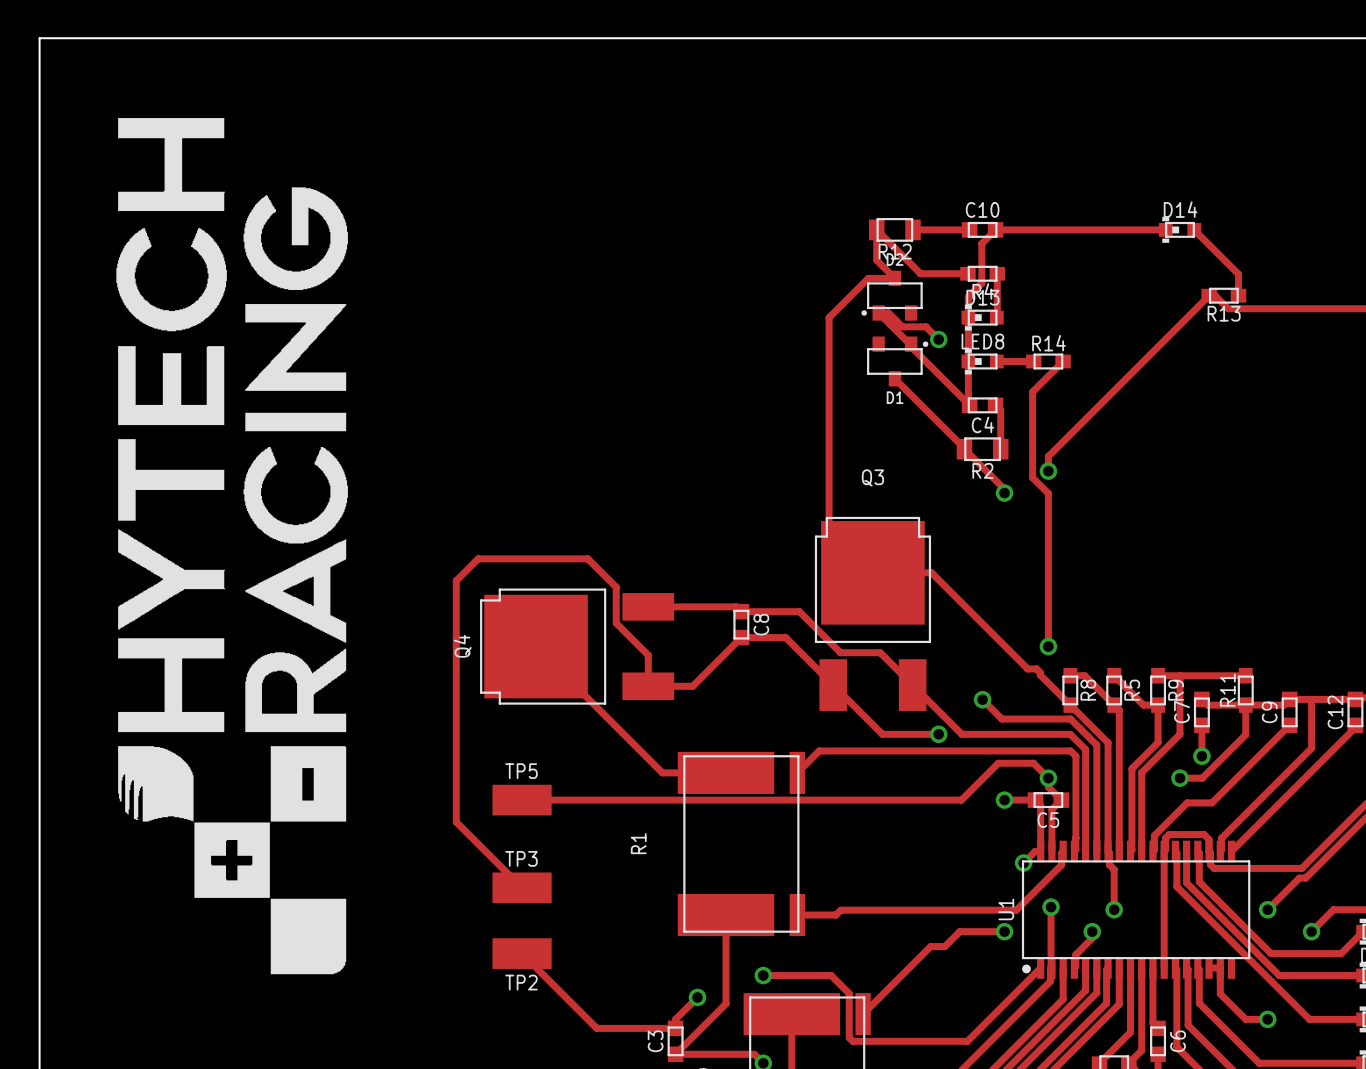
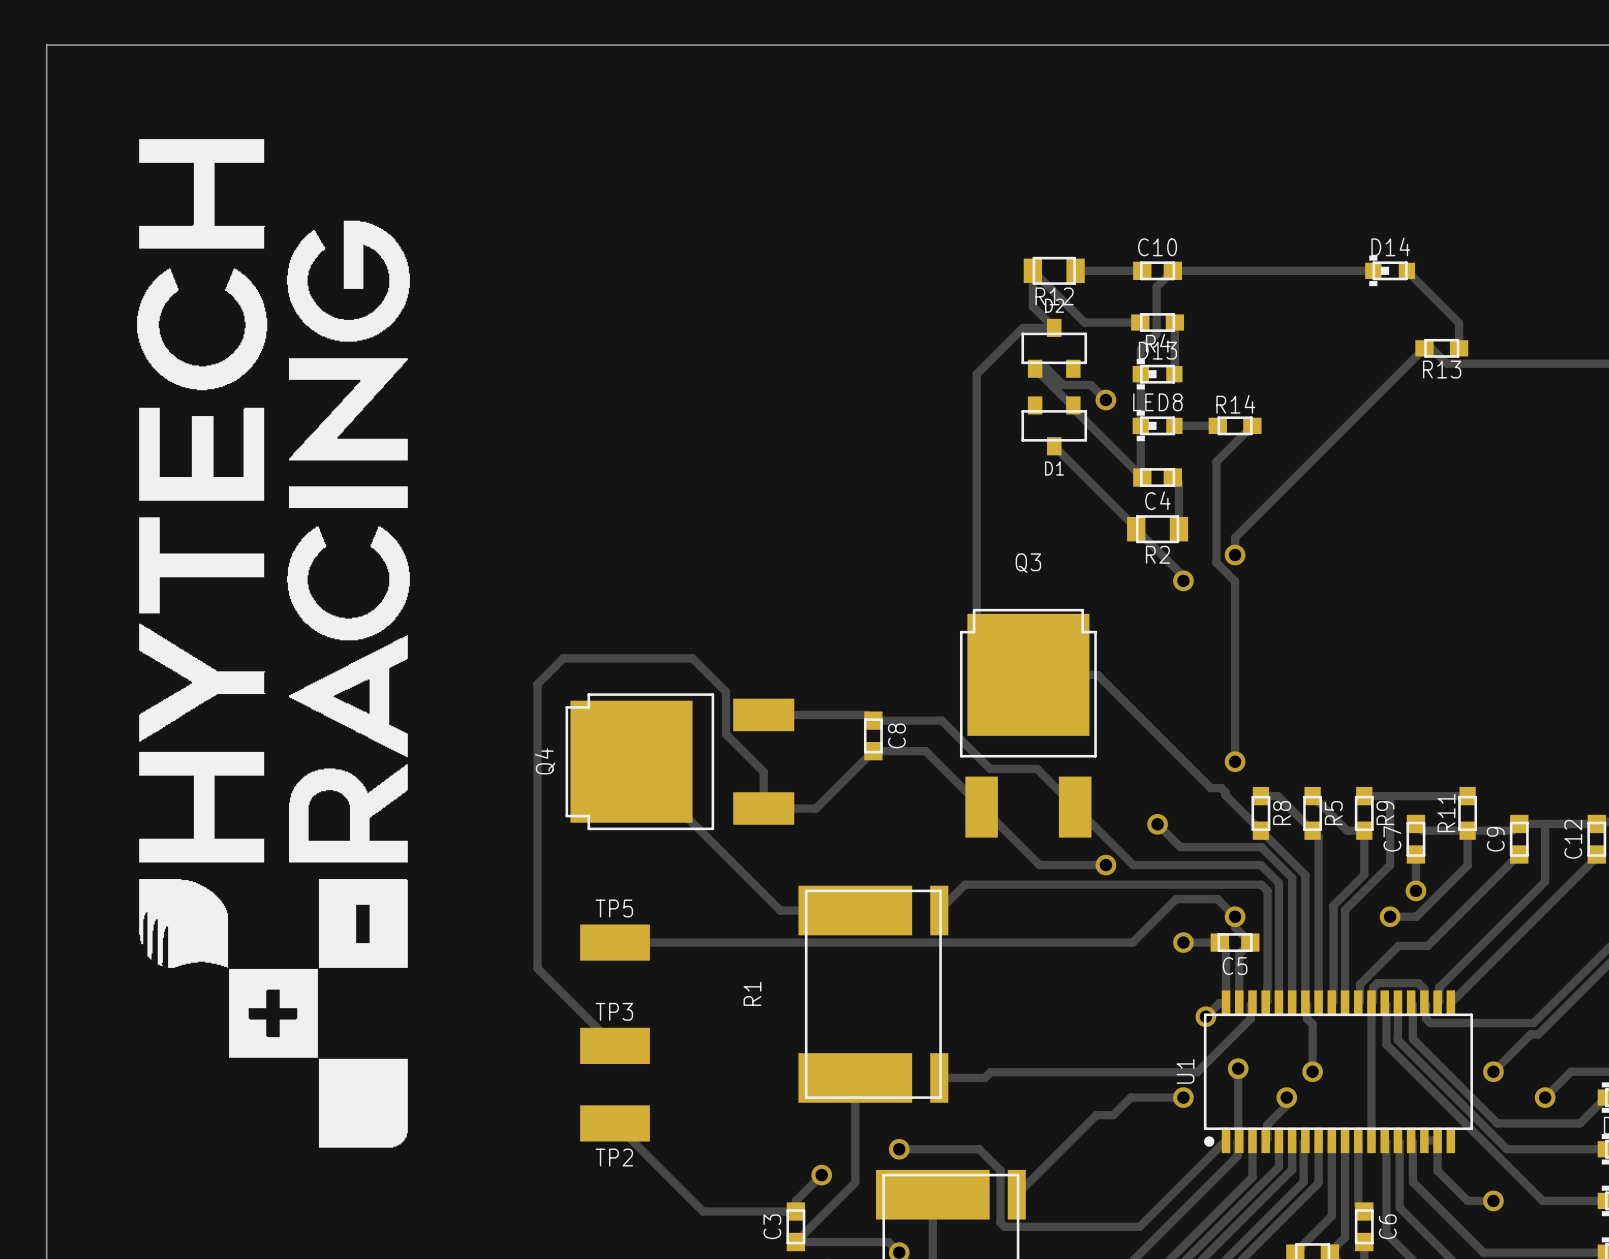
D2 footprint: [861, 270, 923, 321] -> [1021, 318, 1088, 378]
D1 footprint: [867, 336, 929, 387] -> [1021, 396, 1088, 456]

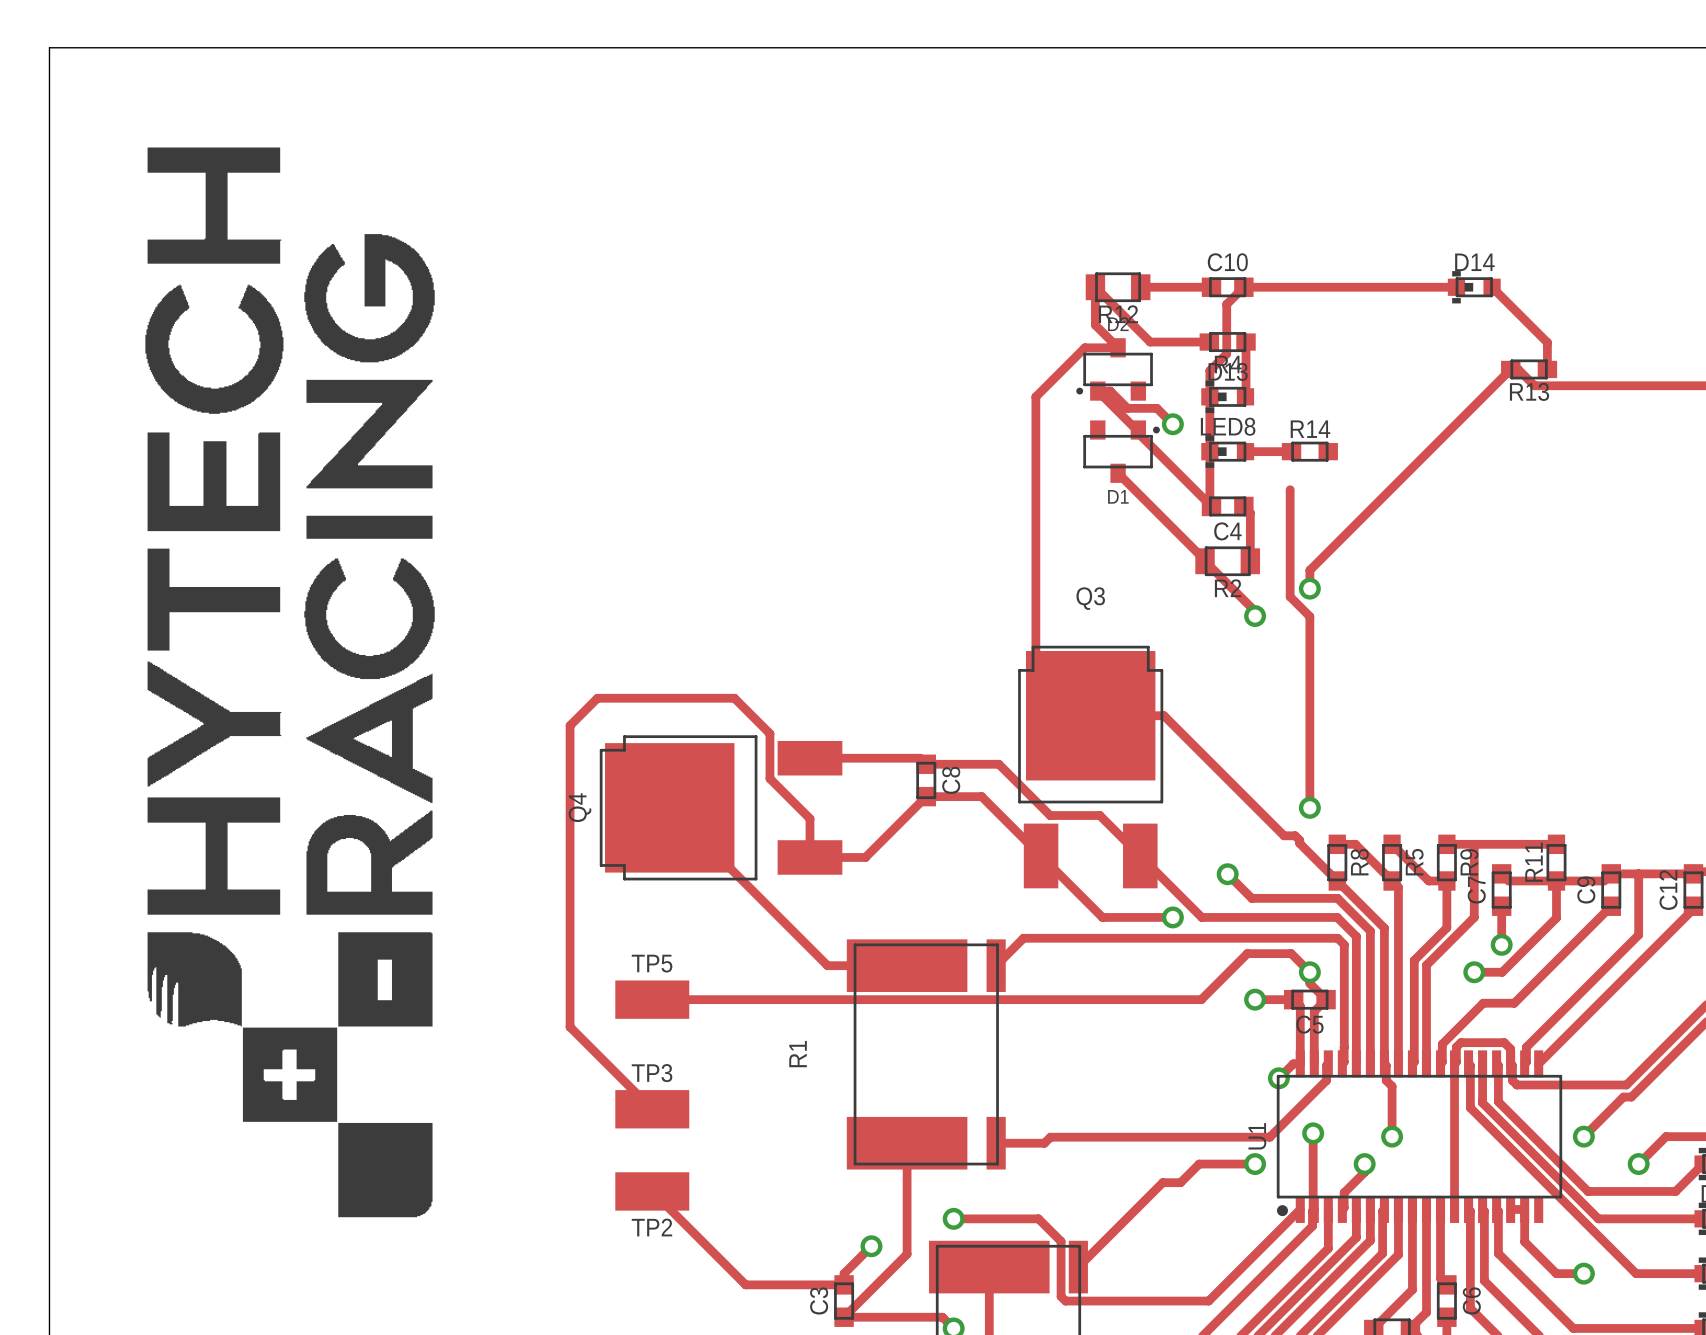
D2 footprint: [1021, 318, 1088, 378] -> [1076, 338, 1153, 401]
D1 footprint: [1021, 396, 1088, 456] -> [1083, 420, 1160, 483]
track: (1252, 425) (1216, 461) -> none

